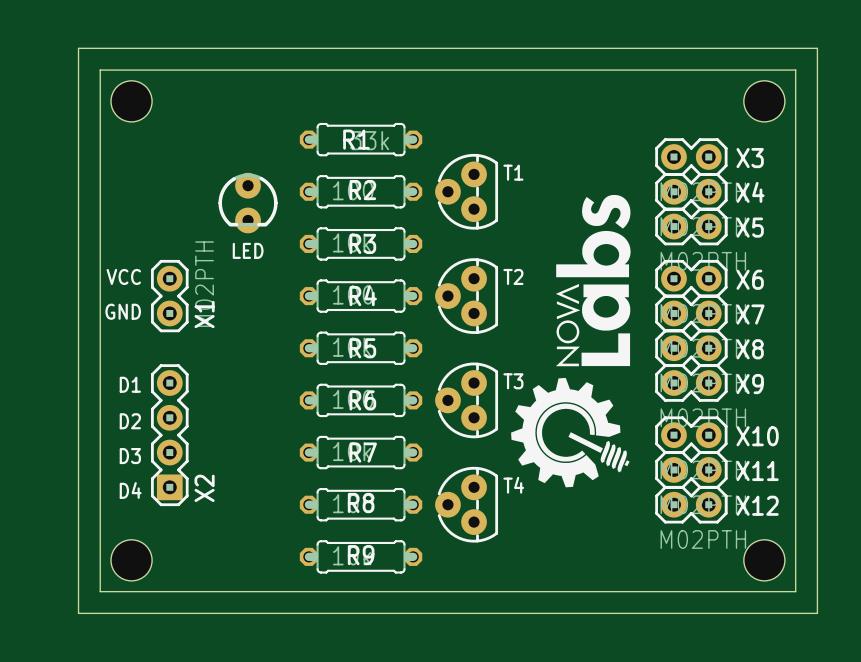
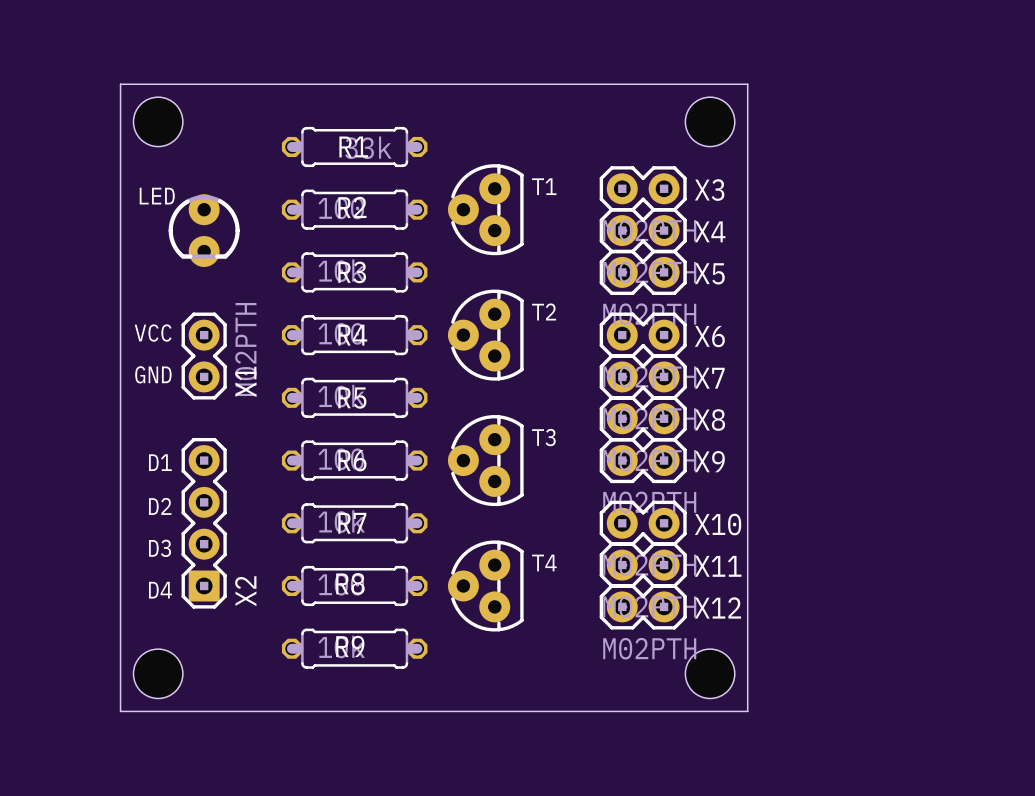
board edge: (78, 48) (78, 613) (817, 613) (817, 48) (78, 48) -> none
board edge: (621, 70) (795, 70) (795, 591) (621, 591) -> (747, 84) (747, 711)
hole position: (764, 101) -> (710, 121)
R1 footprint: [299, 122, 423, 157] -> [281, 126, 428, 168]
X3 position: (691, 157) -> (643, 188)
R2 footprint: [299, 175, 423, 209] -> [281, 189, 428, 230]
T1 position: (466, 191) -> (485, 209)
X4 position: (691, 191) -> (643, 230)
drawing: [510, 194, 631, 488] -> none
LED position: (248, 203) -> (204, 230)
X5 position: (691, 226) -> (643, 272)
R3 footprint: [299, 227, 423, 261] -> [281, 252, 428, 293]
LED name position: LED (248, 250) -> LED (157, 196)
X6 position: (691, 278) -> (643, 335)
R4 footprint: [299, 279, 423, 313] -> [281, 315, 428, 356]
T2 position: (466, 296) -> (485, 335)
X7 position: (691, 313) -> (643, 376)
R5 footprint: [299, 331, 423, 365] -> [281, 377, 428, 418]
X8 position: (691, 348) -> (643, 418)
R6 footprint: [299, 383, 423, 418] -> [281, 440, 428, 481]
X9 position: (691, 383) -> (643, 460)
T3 position: (466, 400) -> (485, 460)
R7 footprint: [299, 435, 423, 470] -> [281, 503, 428, 544]
X10 position: (691, 435) -> (643, 523)
X11 position: (691, 469) -> (643, 565)
R8 footprint: [299, 488, 423, 522] -> [281, 565, 428, 607]
T4 position: (466, 504) -> (485, 585)
X12 position: (691, 504) -> (643, 606)
R9 footprint: [299, 540, 423, 574] -> [281, 628, 428, 669]
hole position: (764, 560) -> (710, 673)

